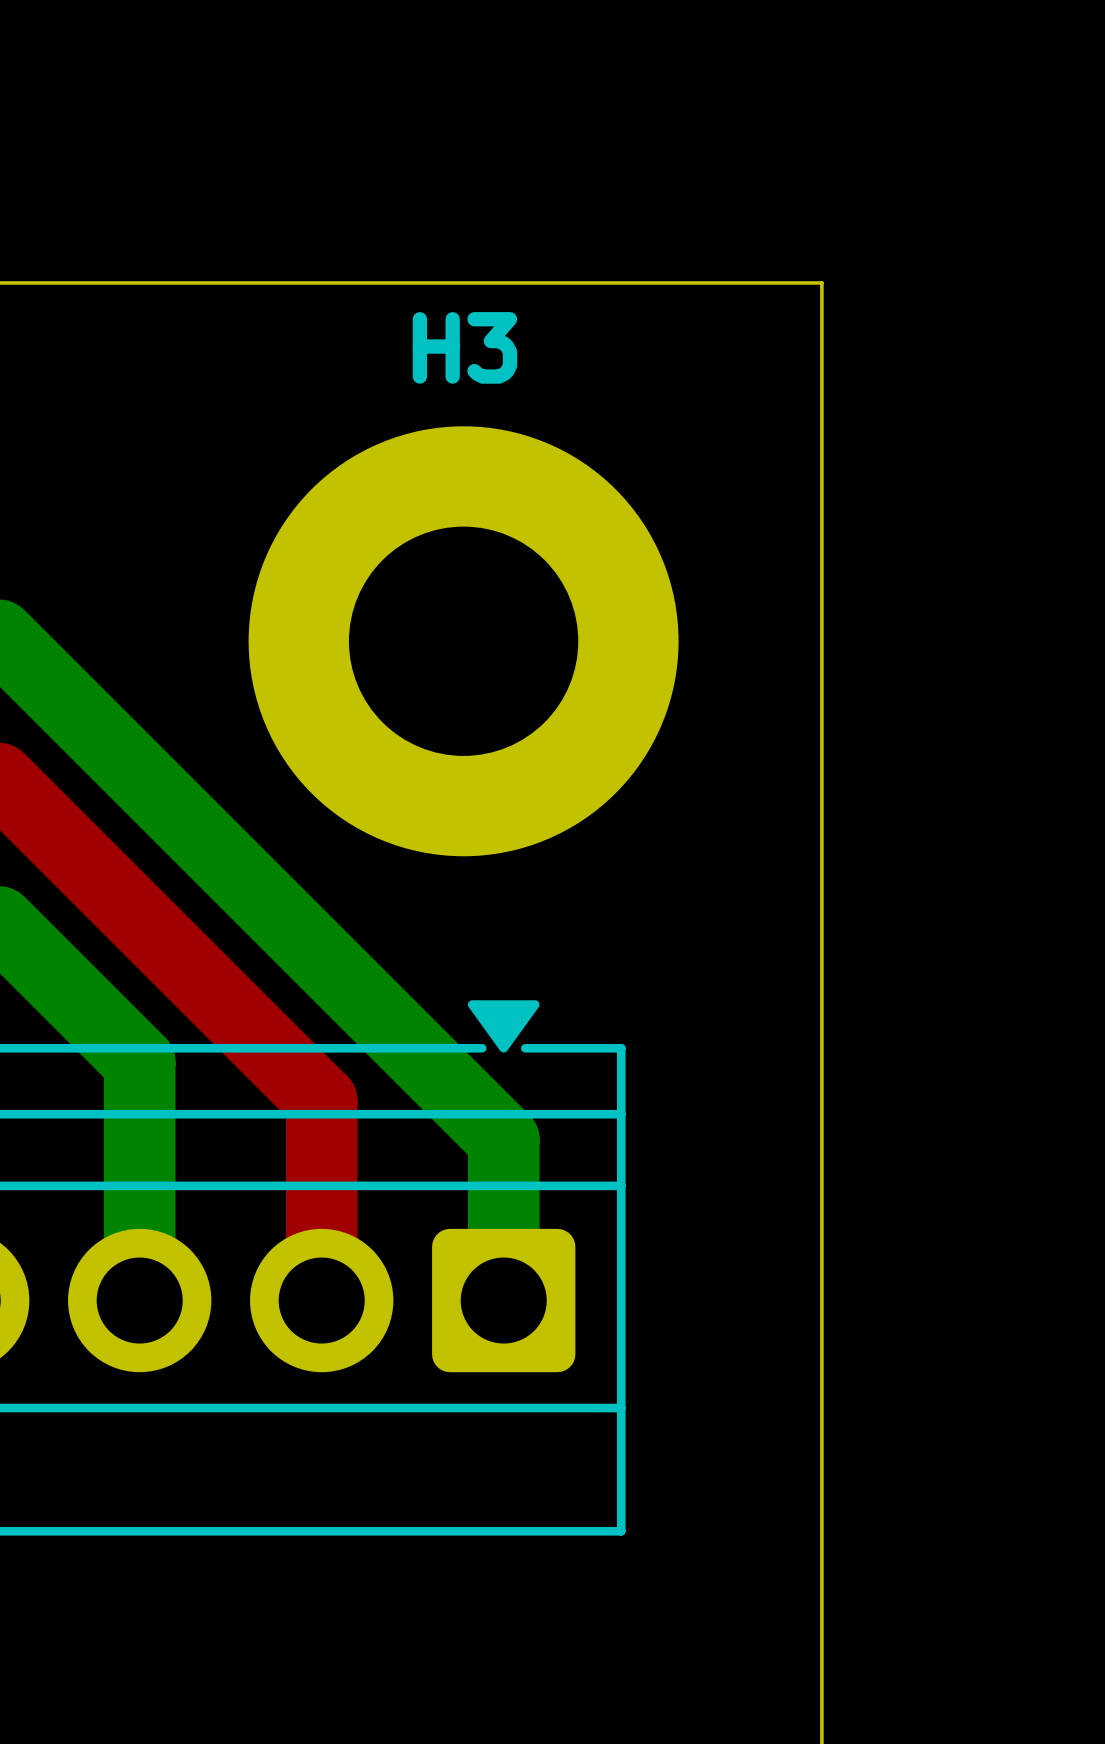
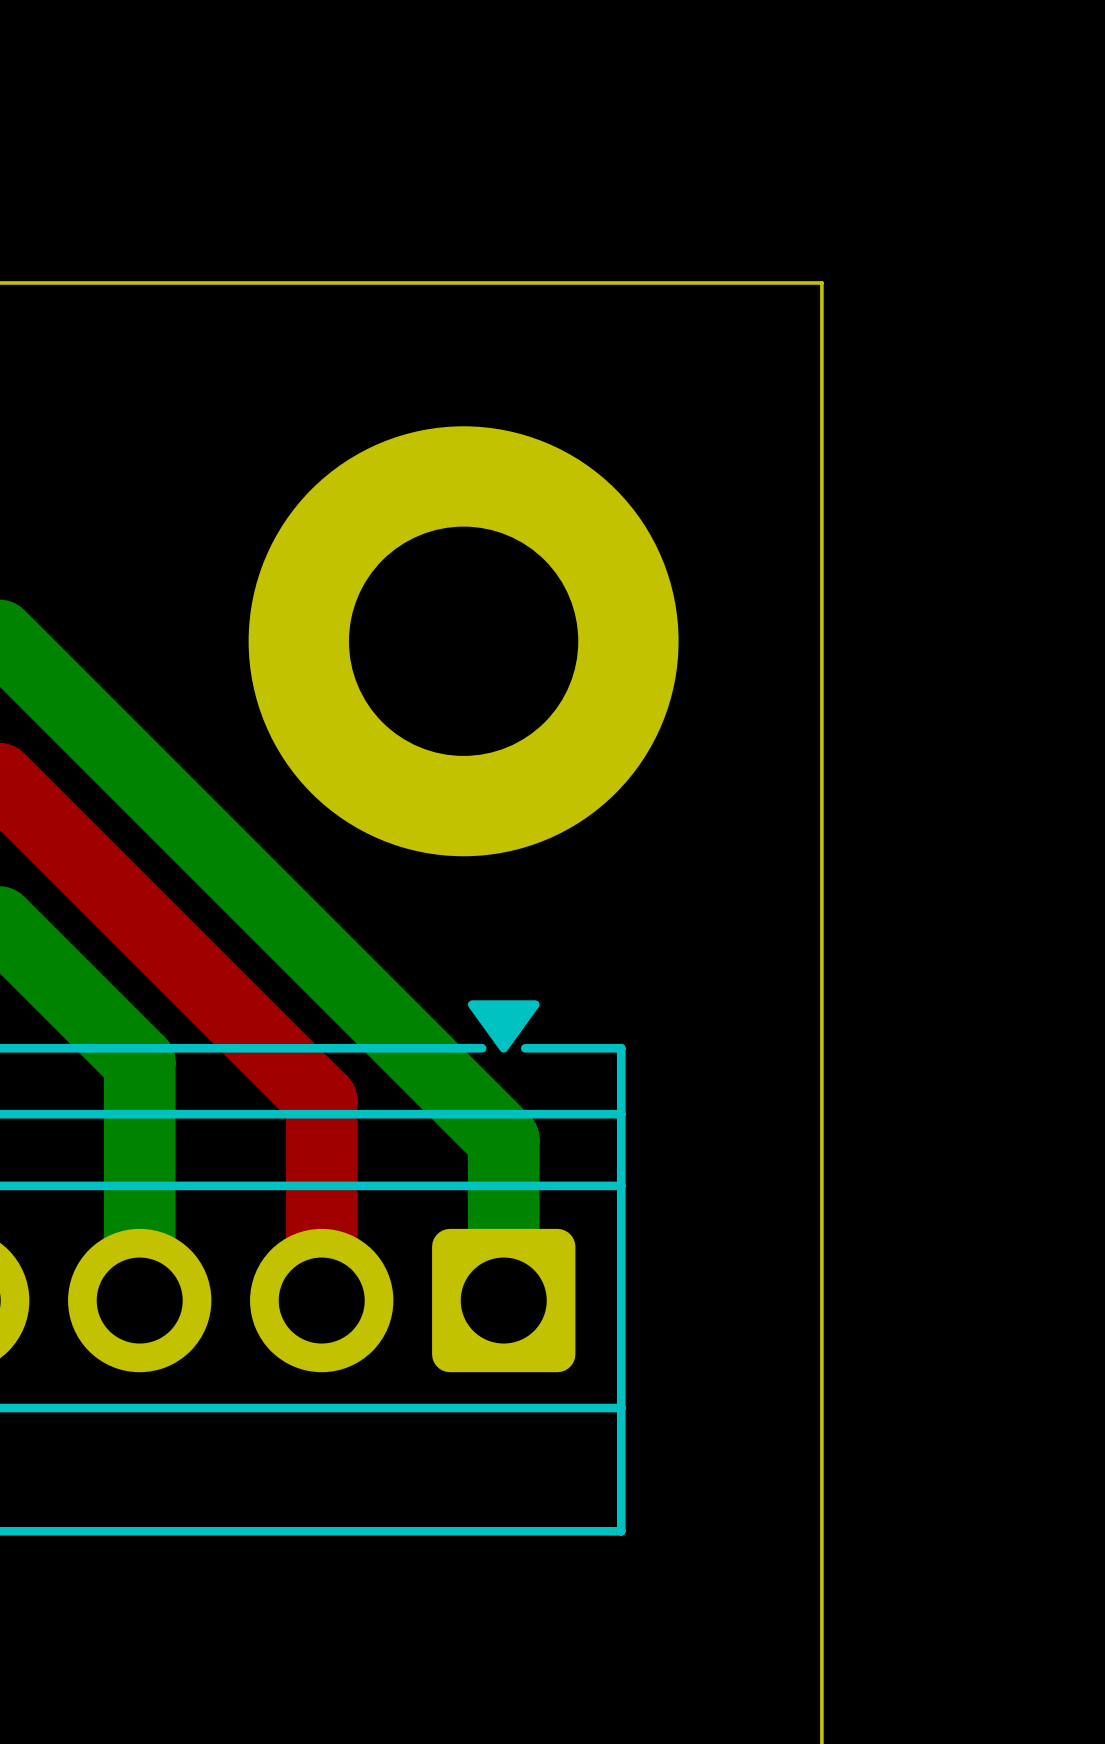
H3 name: H3 (464, 347) -> none

